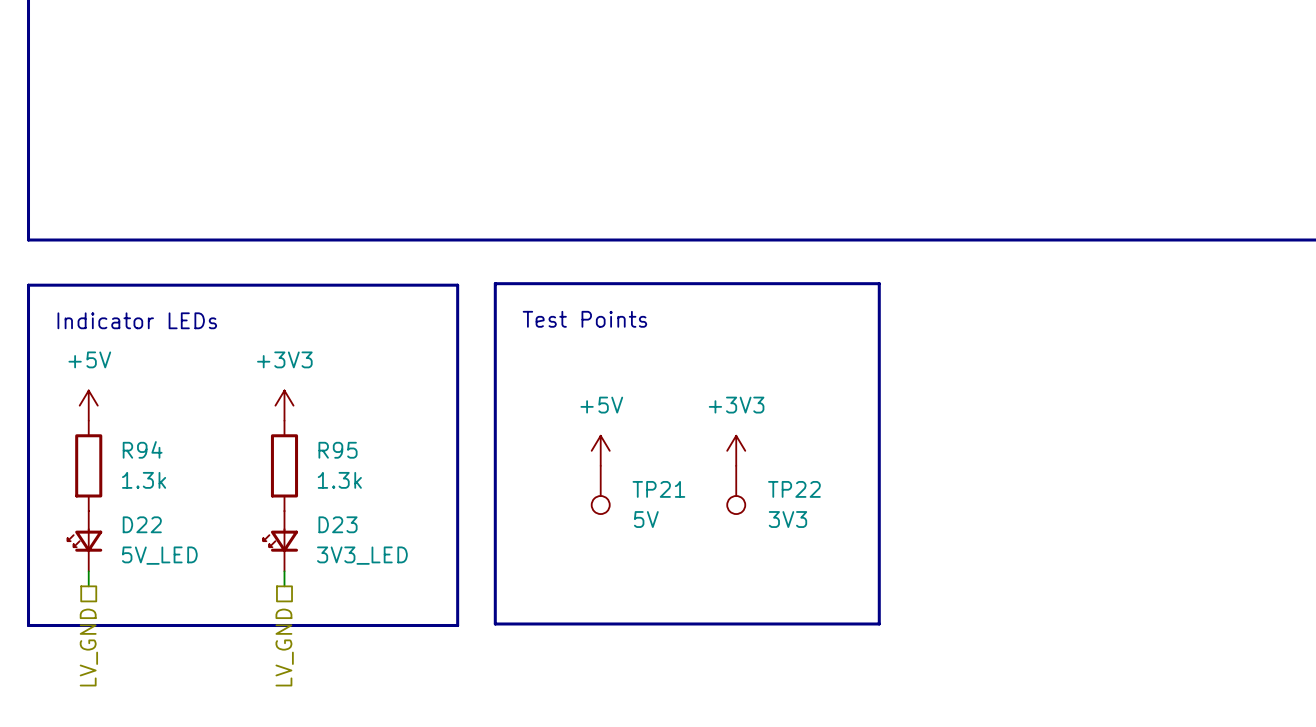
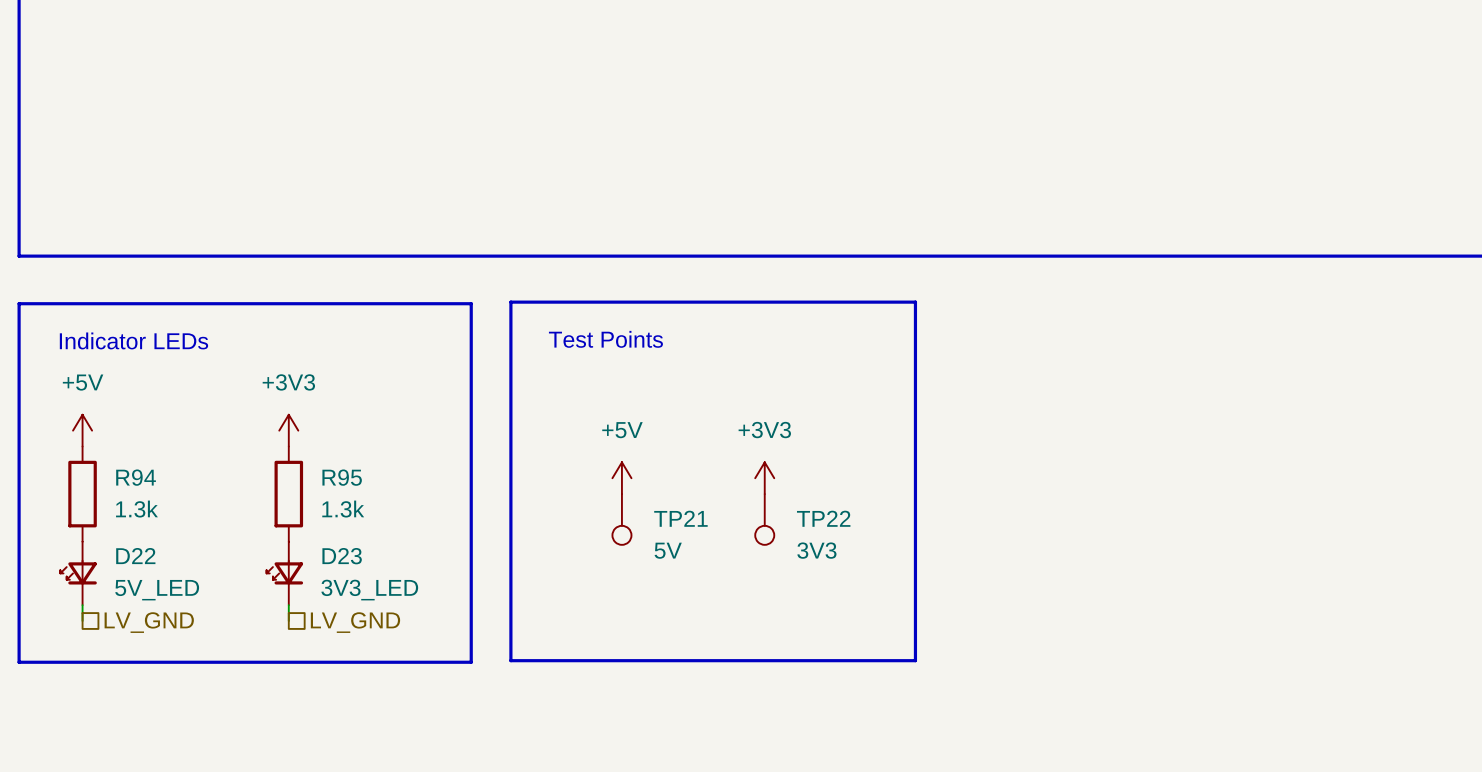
hierarchical label rotation: 0° (88, 647) -> 90° counterclockwise (149, 622)
hierarchical label rotation: 0° (284, 647) -> 90° counterclockwise (355, 622)

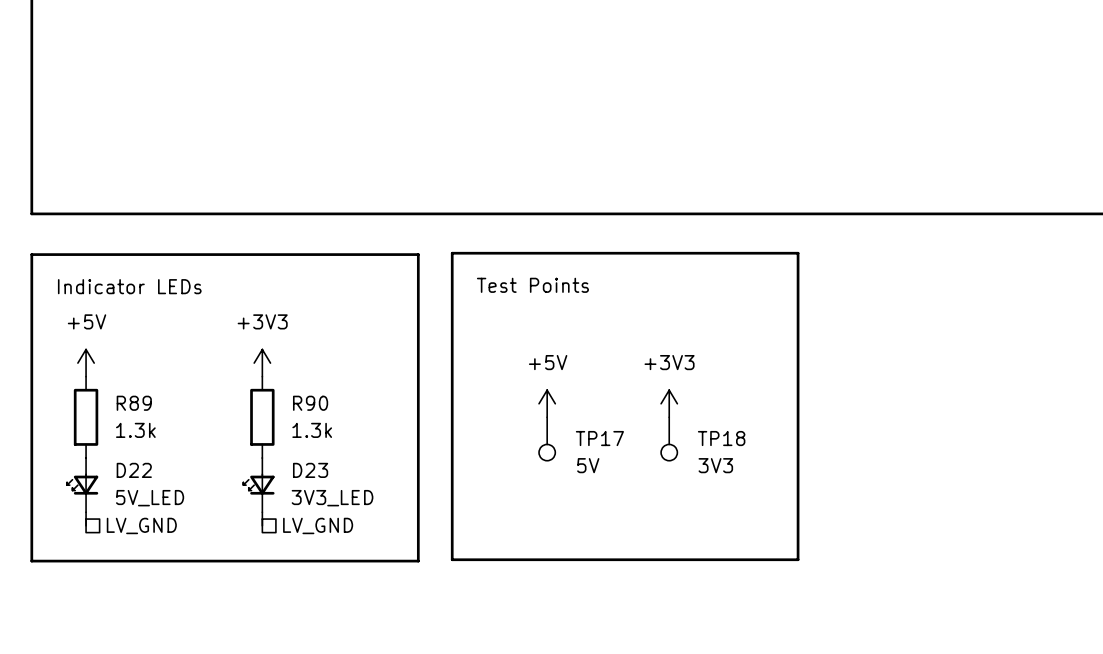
R94 name: R94 (136, 477) -> R89 (134, 403)
R95 name: R95 (342, 477) -> R90 (310, 403)
TP21 name: TP21 (680, 518) -> TP17 (599, 438)
TP22 name: TP22 (823, 518) -> TP18 (721, 438)

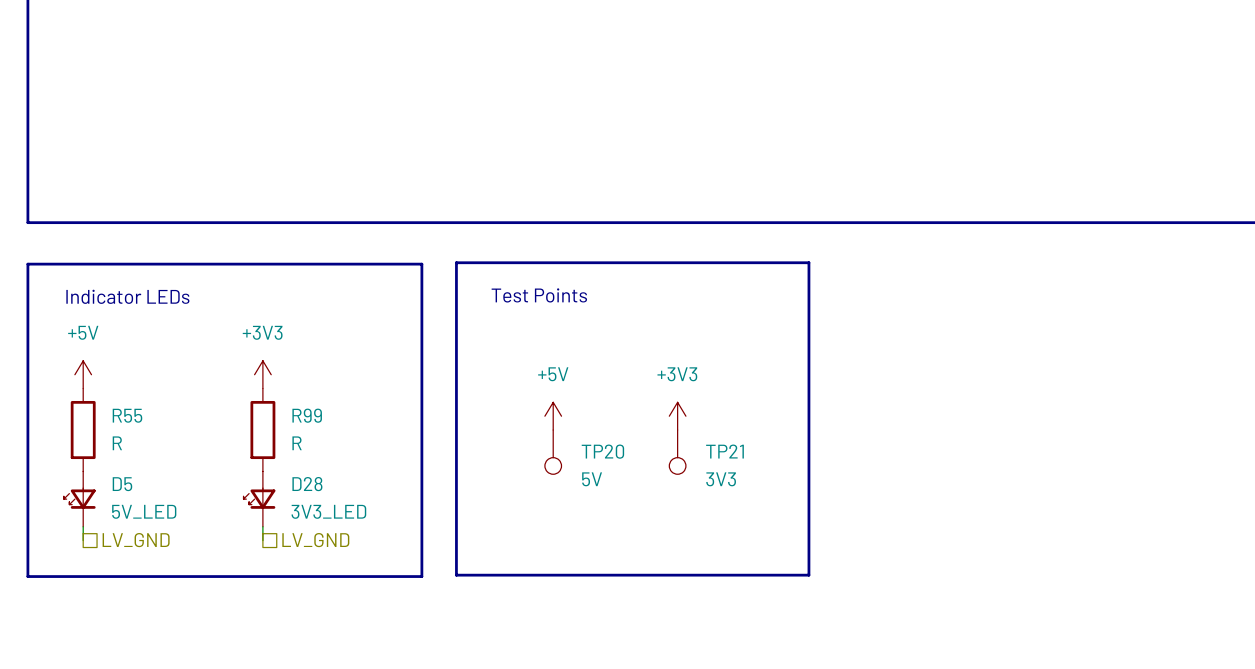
R89 name: R89 (134, 403) -> R55 (127, 415)
R90 name: R90 (310, 403) -> R99 (307, 415)
R89 value: 1.3k (135, 430) -> R (117, 443)
R90 value: 1.3k (312, 430) -> R (297, 443)
TP17 name: TP17 (599, 438) -> TP20 (602, 451)
TP18 name: TP18 (721, 438) -> TP21 (724, 451)
D22 name: D22 (134, 470) -> D5 (122, 484)
D23 name: D23 (310, 470) -> D28 (307, 484)

